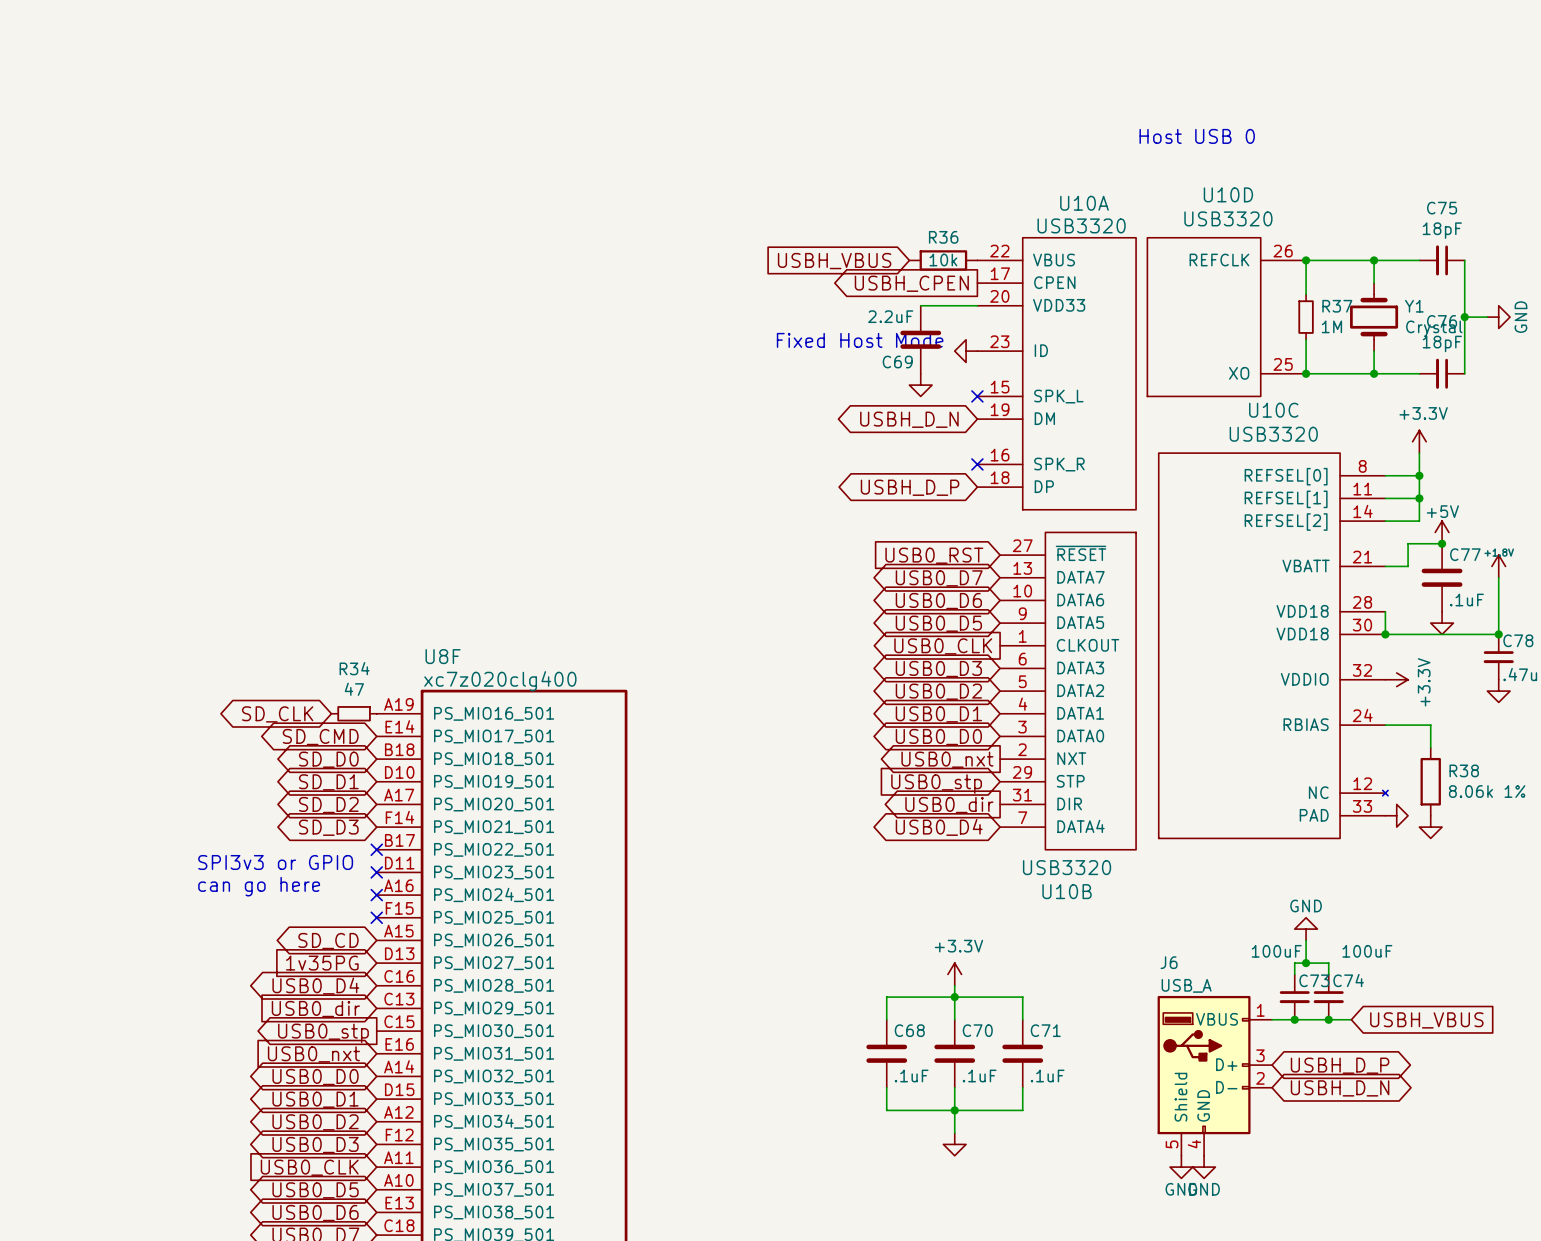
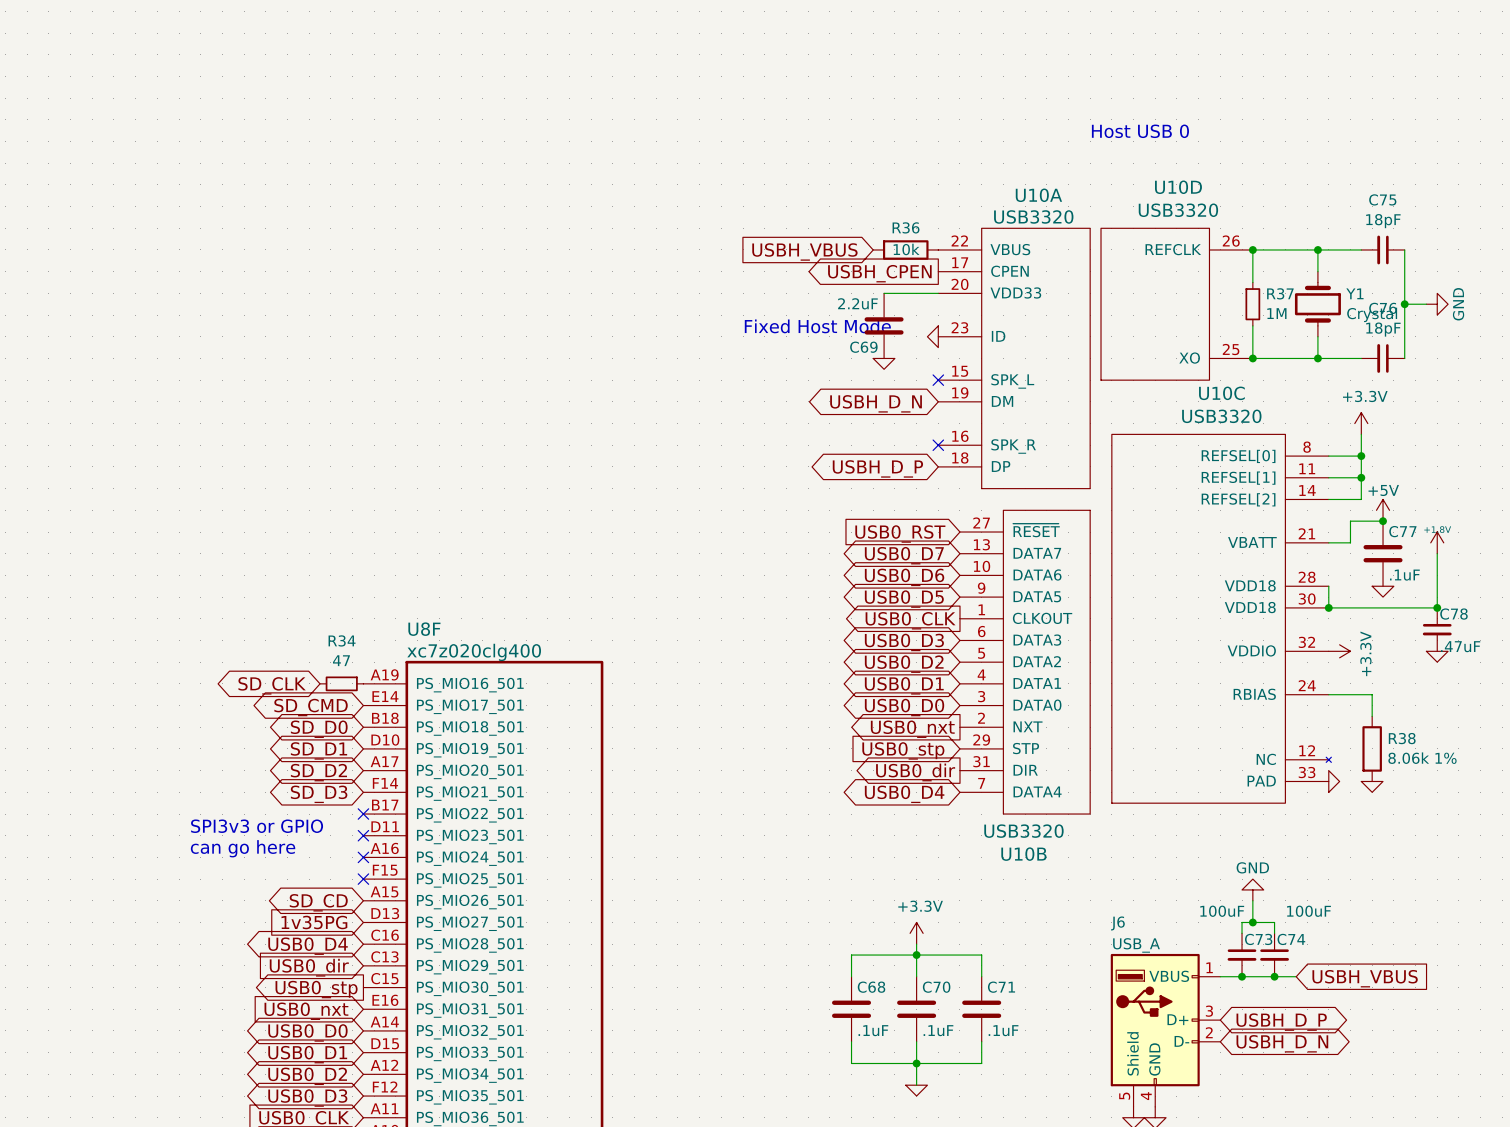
power symbol shape: [954, 339, 978, 363] -> [927, 325, 939, 348]
power symbol shape: [909, 373, 933, 397] -> [873, 358, 895, 370]
power symbol shape: [1430, 611, 1454, 635] -> [1372, 586, 1394, 598]
power symbol shape: [1487, 679, 1511, 703] -> [1426, 651, 1449, 663]
power symbol shape: [1385, 804, 1409, 828] -> [1328, 770, 1340, 793]
power symbol shape: [1419, 815, 1443, 839] -> [1361, 781, 1384, 793]
power symbol shape: [943, 1133, 967, 1156] -> [905, 1085, 928, 1097]

